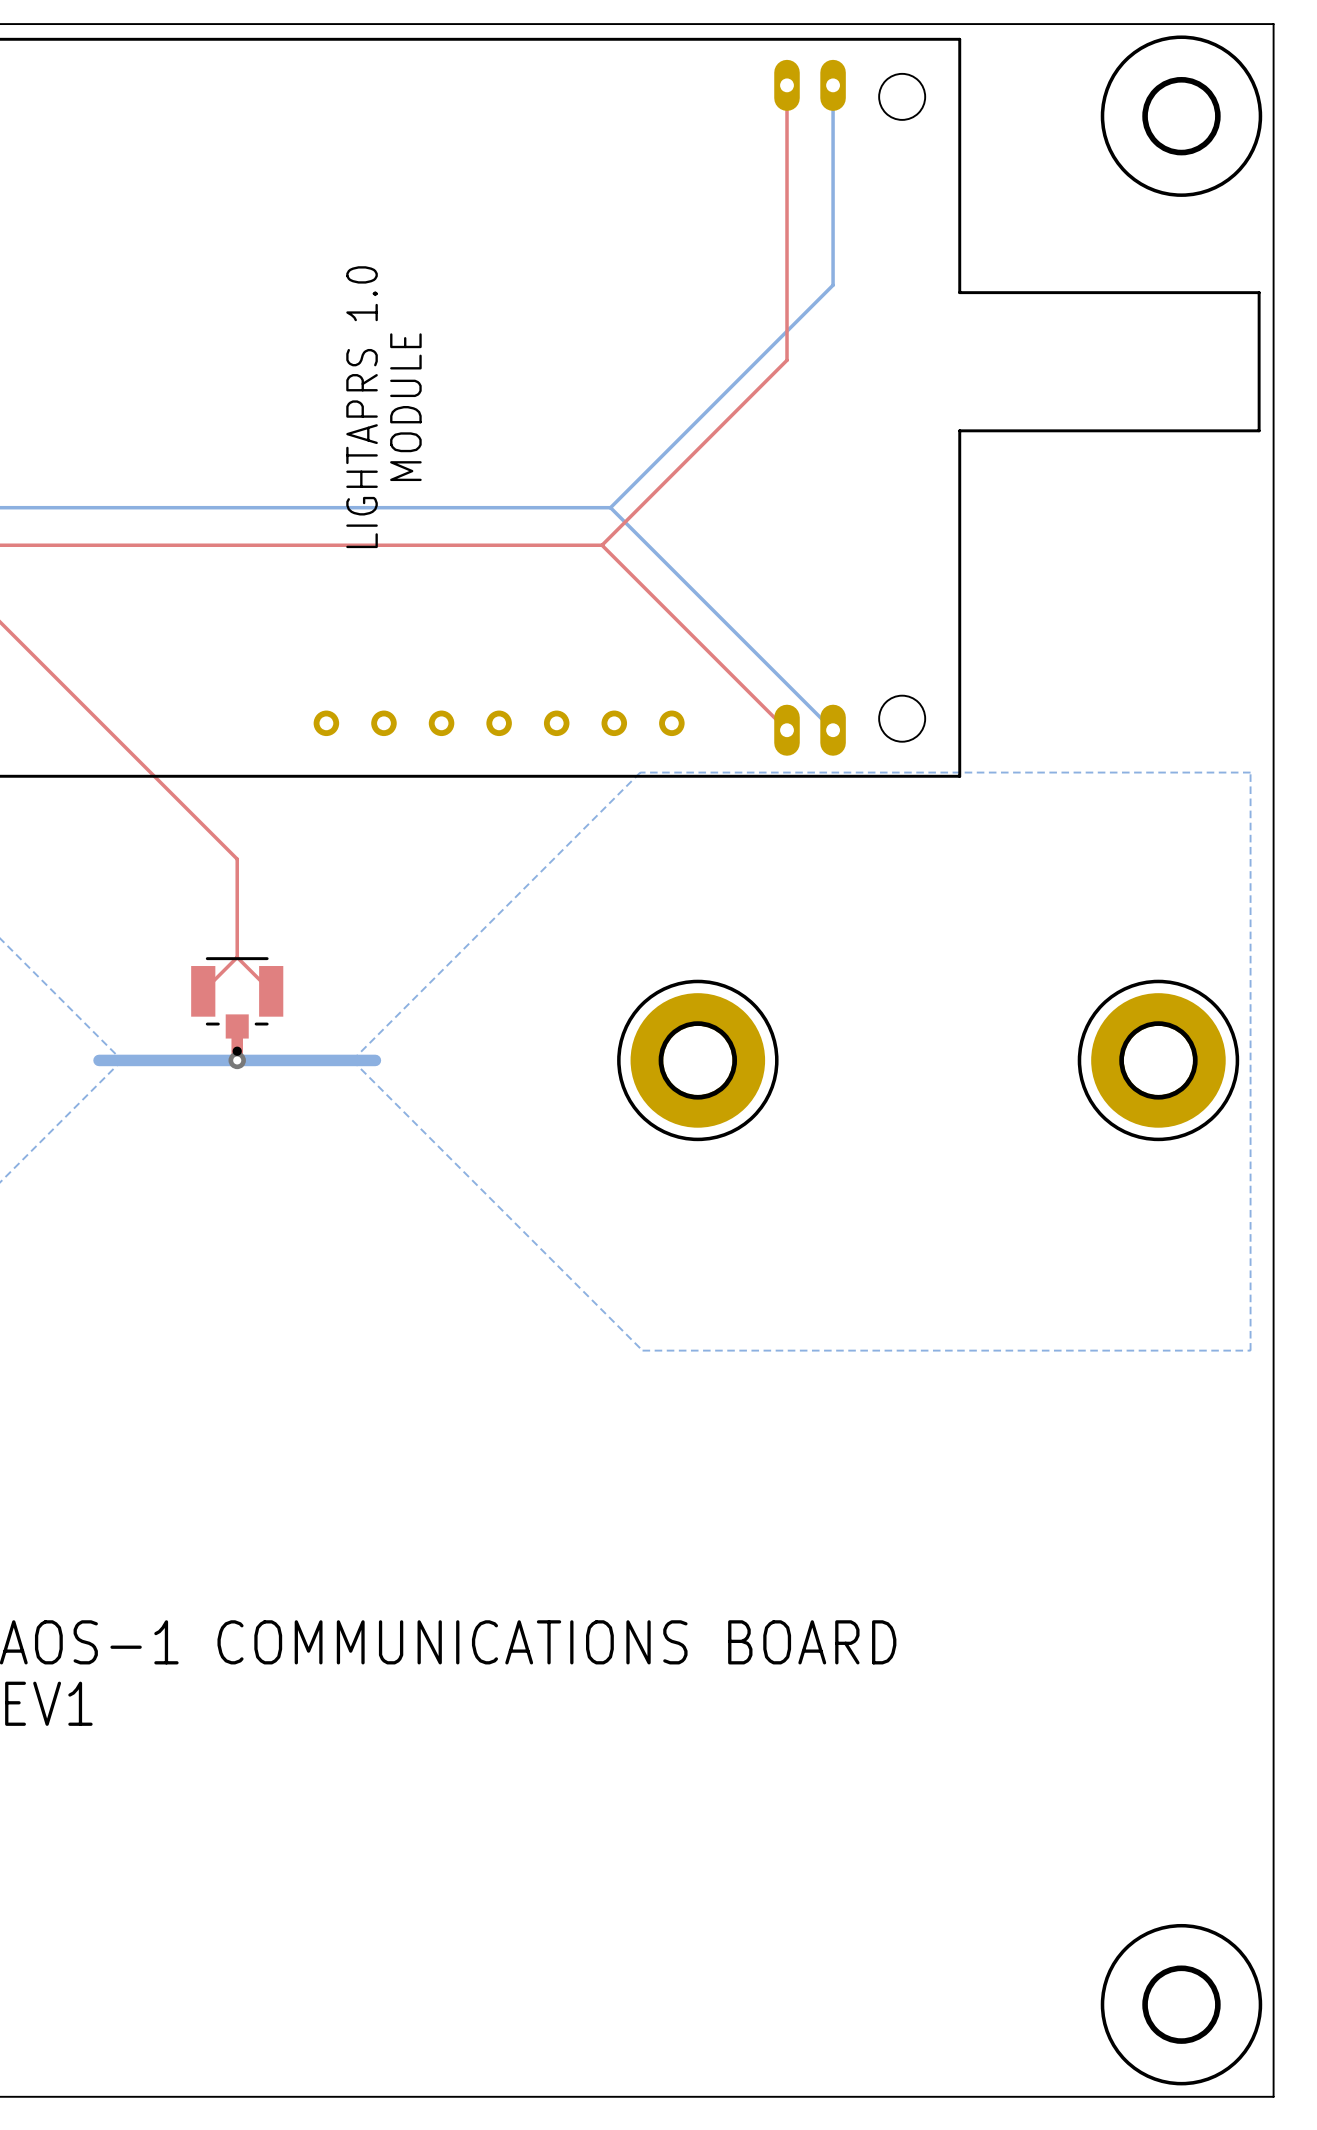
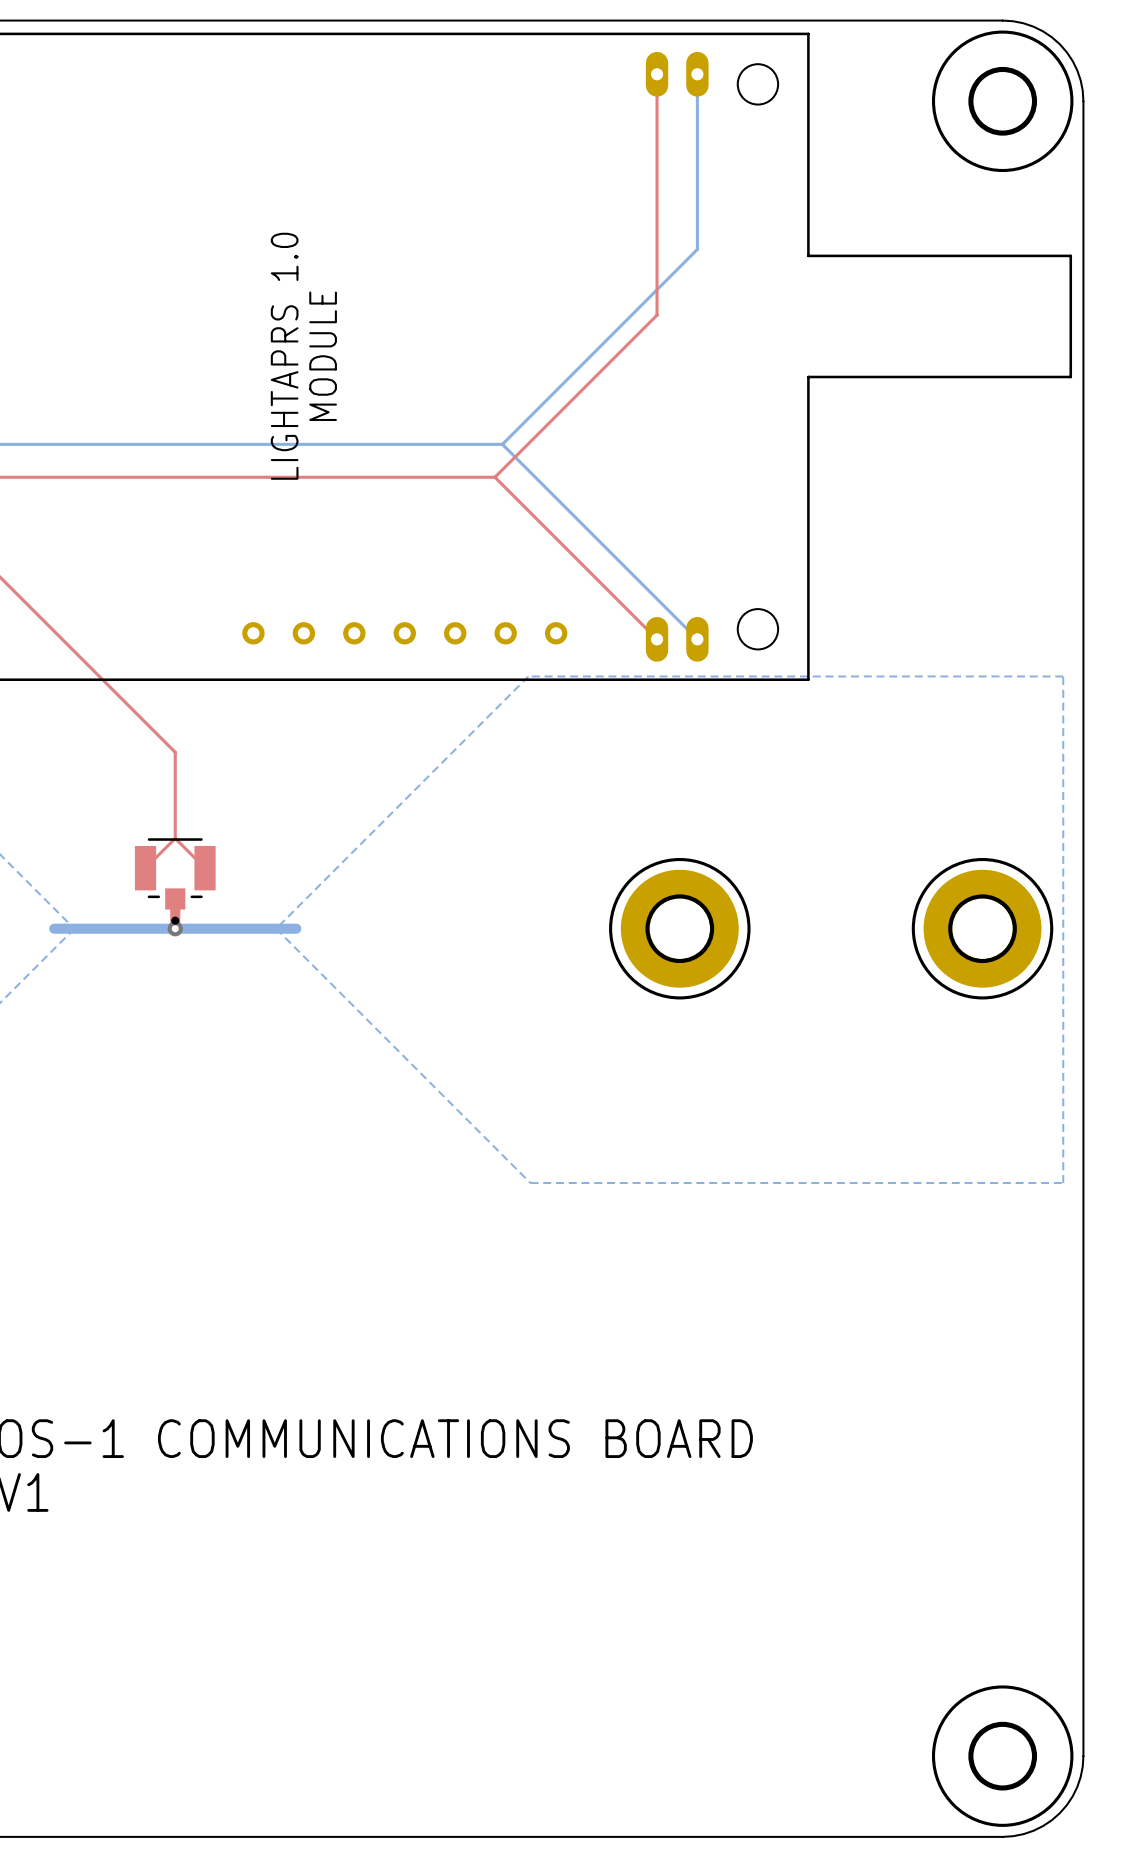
board edge: (1181, 24) (1273, 24) (1273, 116) -> (1002, 20) (1033, 26) (1059, 44) (1077, 70) (1083, 101)
part position: (697, 1060) -> (679, 928)
board edge: (1273, 2004) (1273, 2096) (1181, 2096) -> (1083, 1756) (1077, 1787) (1059, 1813) (1033, 1830) (1002, 1836)

